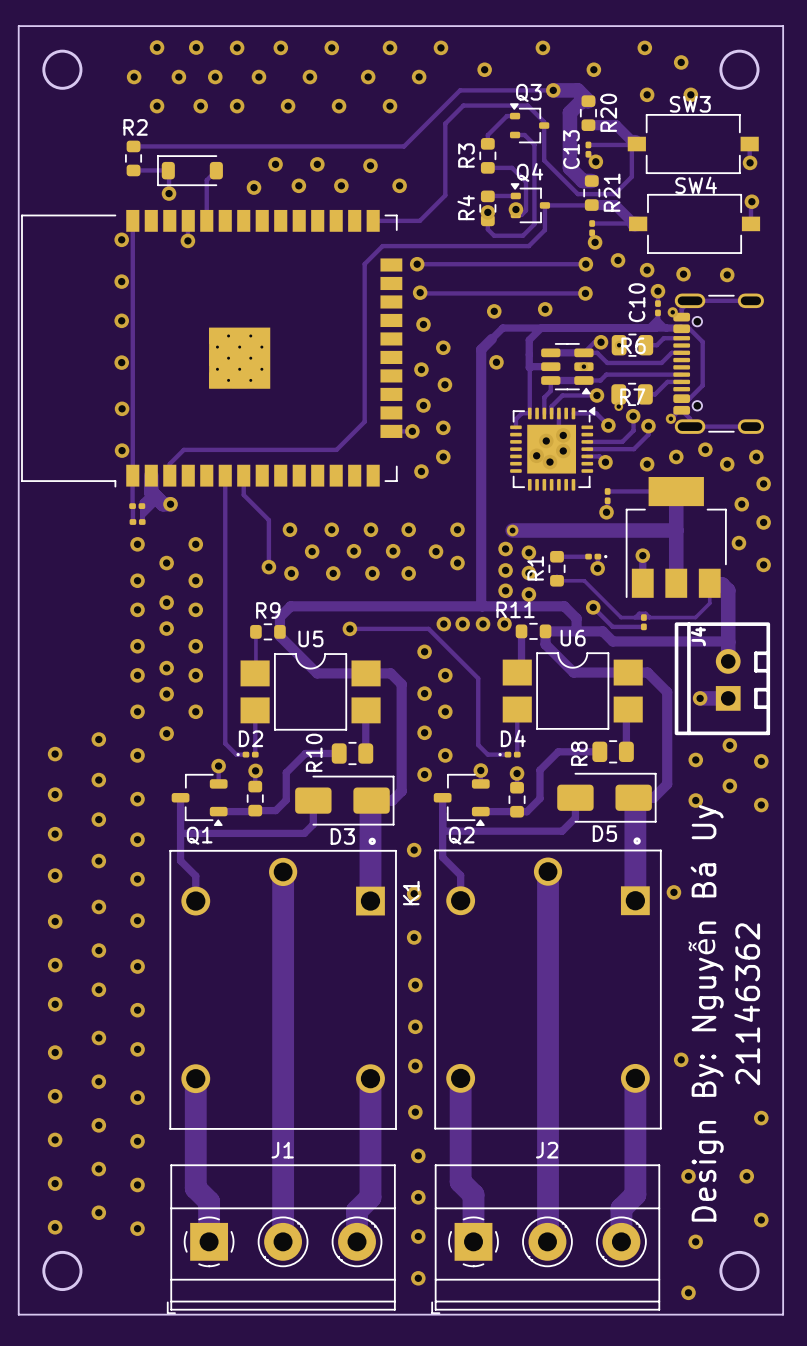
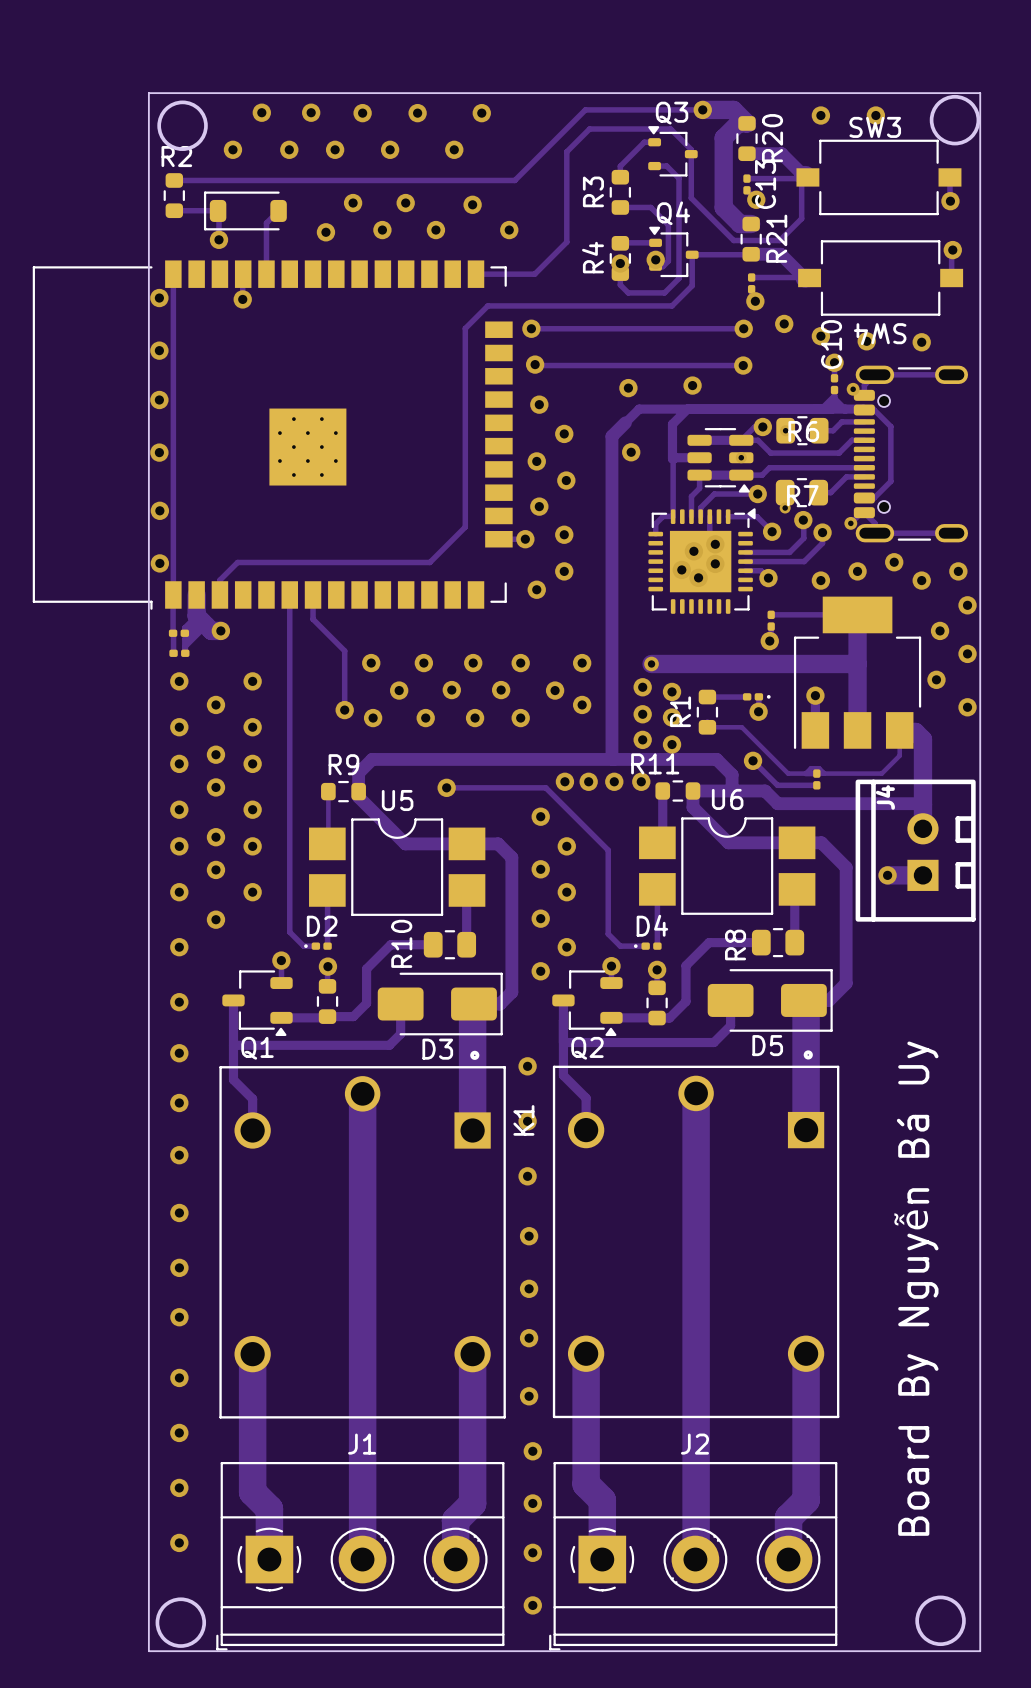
via: (157, 47) -> none
via: (196, 47) -> none
via: (237, 47) -> none
via: (280, 47) -> none
via: (331, 47) -> none
via: (390, 47) -> none
via: (440, 47) -> none
via: (542, 47) -> none
via: (644, 47) -> none
via: (681, 62) -> none
round board edge position: (62, 69) -> (182, 125)
via: (484, 69) -> none
via: (593, 69) -> none
round board edge position: (739, 69) -> (954, 120)
via: (134, 77) -> none
via: (178, 77) -> none
via: (215, 77) -> none
via: (258, 77) -> none
via: (309, 77) -> none
via: (368, 77) -> none
via: (419, 77) -> none
via: none -> (417, 113)
via: none -> (481, 113)
via: (157, 106) -> none
via position: (200, 106) -> (261, 112)
via position: (237, 106) -> (311, 112)
via position: (288, 106) -> (362, 113)
via: (339, 106) -> none
via: (390, 106) -> none
via: none -> (232, 149)
via: none -> (289, 149)
via: none -> (335, 149)
via: none -> (390, 149)
via: none -> (454, 149)
C13 name position: C13 (571, 149) -> C13 (765, 184)
SW4 name rotation: 0° (696, 185) -> 180° (880, 334)
SW4 name position: SW4 (696, 185) -> SW4 (880, 334)
C10 name position: C10 (636, 302) -> C10 (831, 344)
via: (98, 739) -> none
via: (729, 745) -> none
via: (55, 754) -> none
via: (695, 759) -> none
via: (761, 761) -> none
via: (98, 780) -> none
via: (729, 785) -> none
via: (55, 794) -> none
via: (695, 800) -> none
via: (761, 805) -> none
via: (98, 819) -> none
via: (55, 834) -> none
via: (98, 861) -> none
via: (55, 875) -> none
via: (673, 892) -> none
via: (98, 906) -> none
via: (55, 921) -> none
via: (98, 950) -> none
via: (55, 965) -> none
via: (98, 989) -> none
via: (55, 1004) -> none
text: 21146362 (747, 1004) -> none
text: Design By: Nguyễn Bá Uy (705, 1013) -> Board By Nguyễn Bá Uy (915, 1288)
via: (98, 1038) -> none
via: (55, 1052) -> none
via: (681, 1059) -> none
via: (98, 1081) -> none
via: (55, 1096) -> none
via: (761, 1118) -> none
via: (98, 1125) -> none
via: (55, 1139) -> none
via: (98, 1169) -> none
via: (688, 1176) -> none
via: (746, 1176) -> none
via: (55, 1183) -> none
via: (98, 1212) -> none
via: (761, 1220) -> none
via: (55, 1227) -> none
via: (695, 1241) -> none
round board edge position: (62, 1270) -> (180, 1622)
round board edge position: (739, 1270) -> (940, 1620)
via: (688, 1292) -> none
board edge: (113, 1314) (18, 1314) (18, 26) (783, 26) (783, 1314) (773, 1314) -> (148, 1651) (148, 93) (980, 93) (980, 1651)

